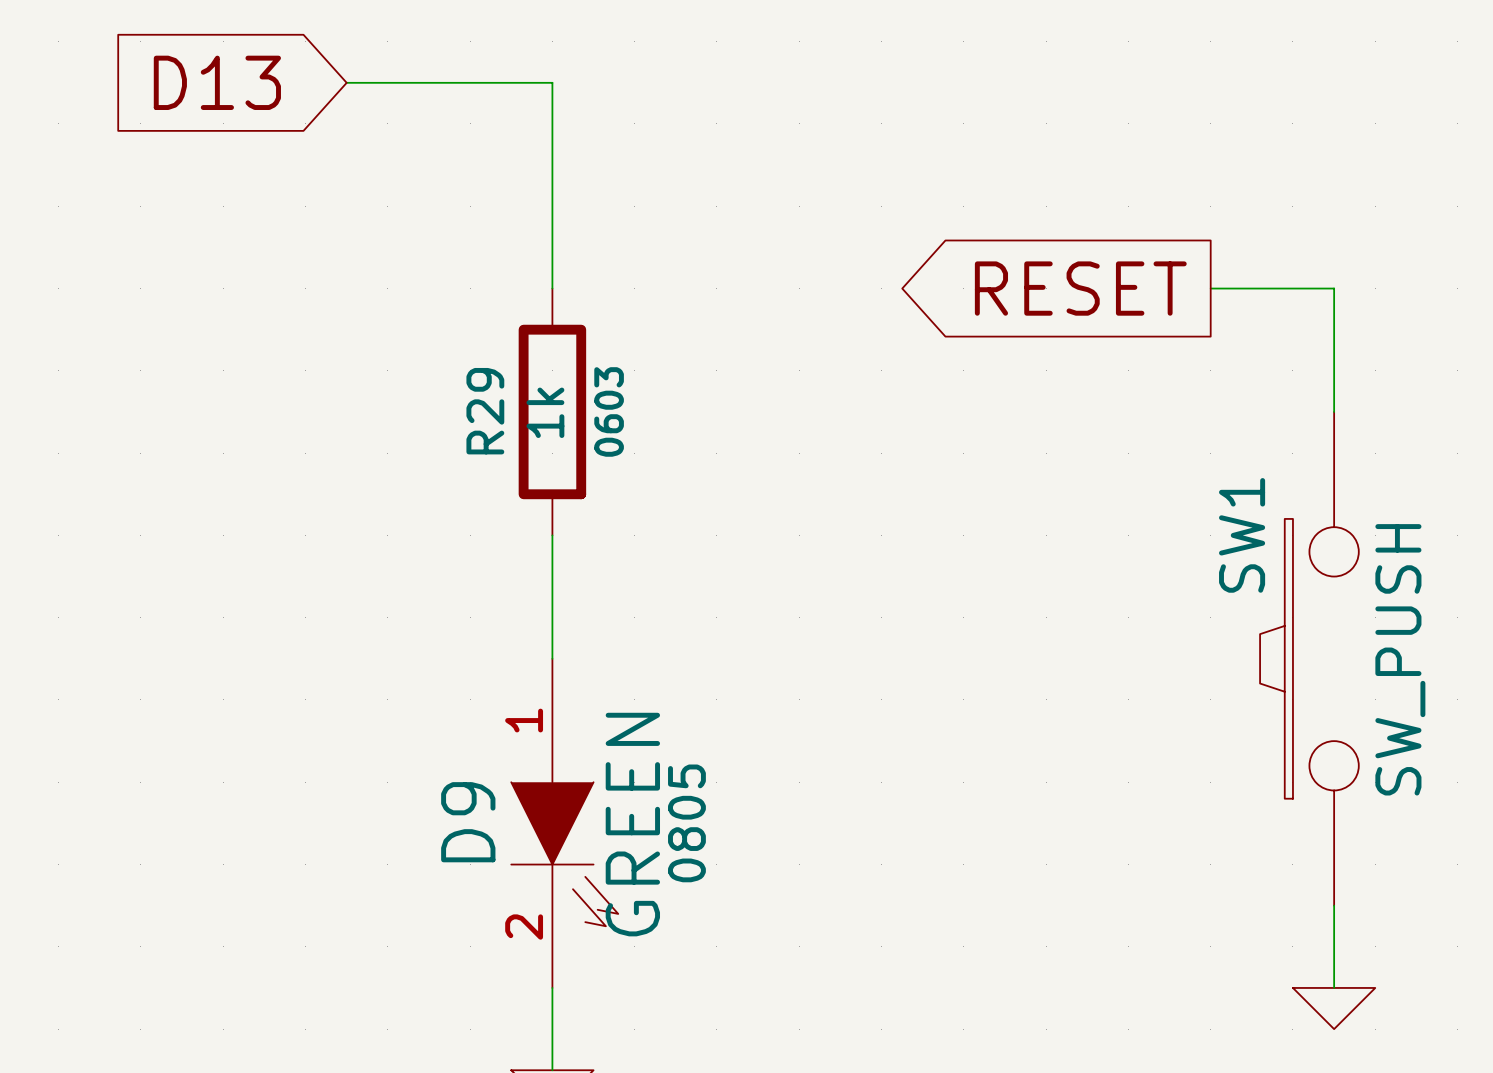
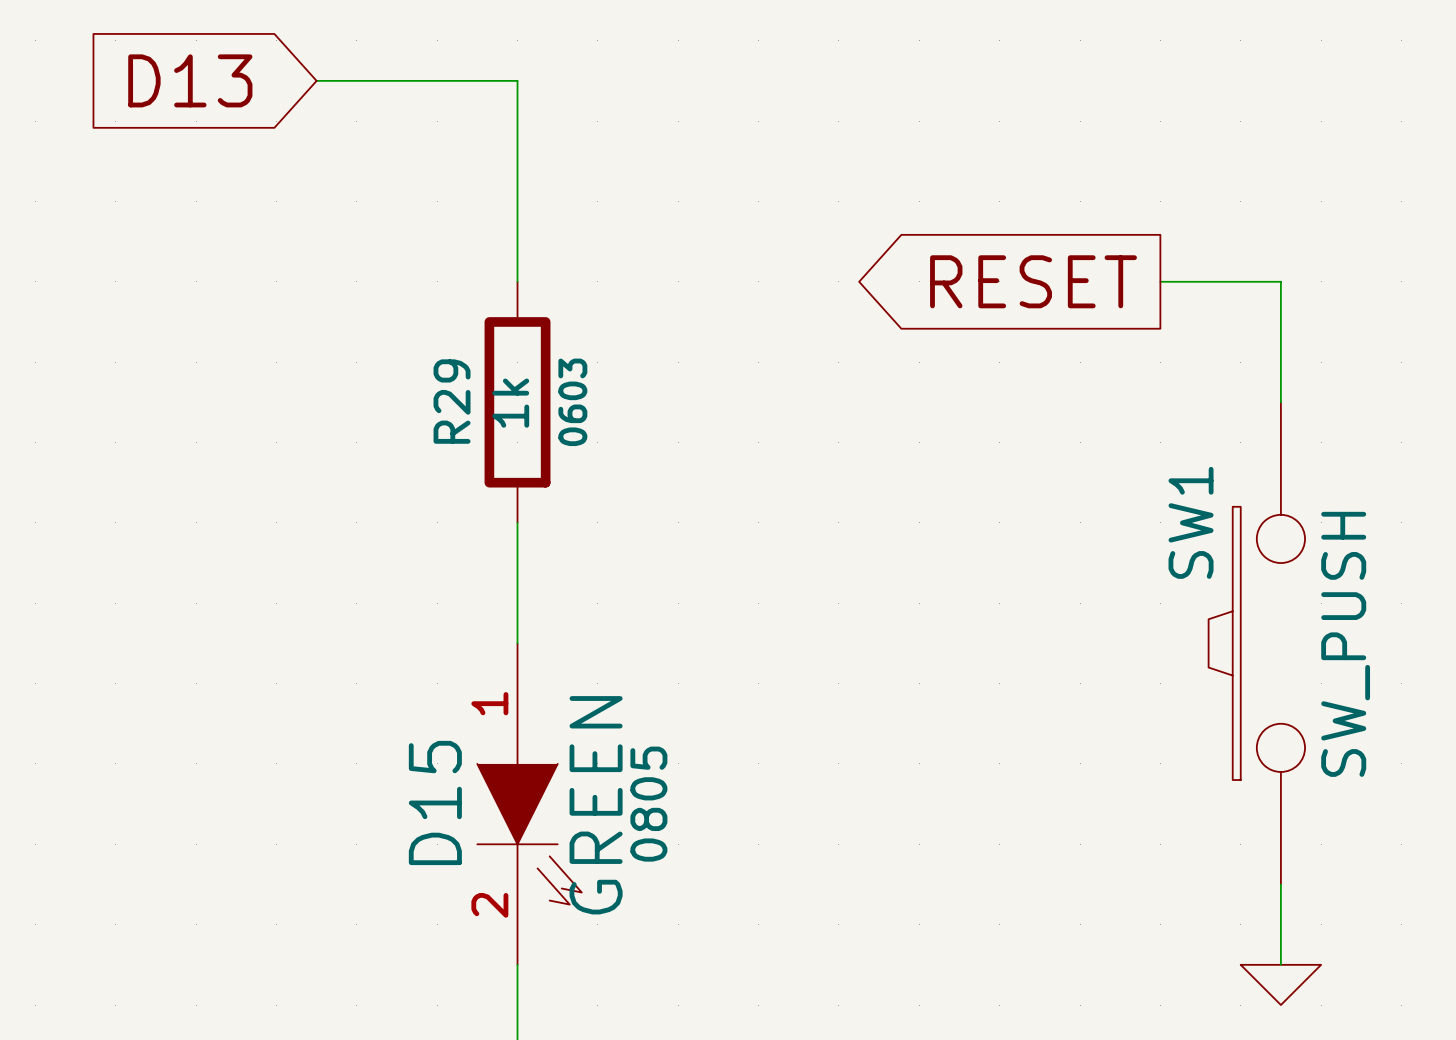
D9 name: D9 (468, 822) -> D15 (435, 802)

